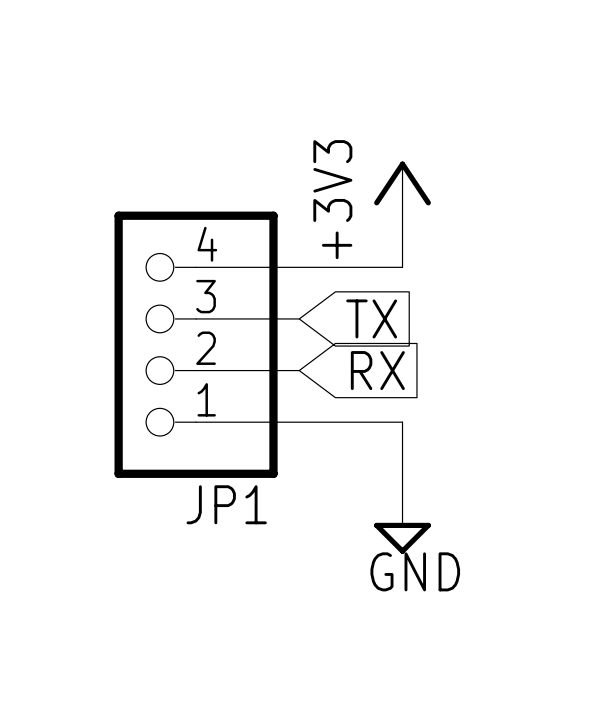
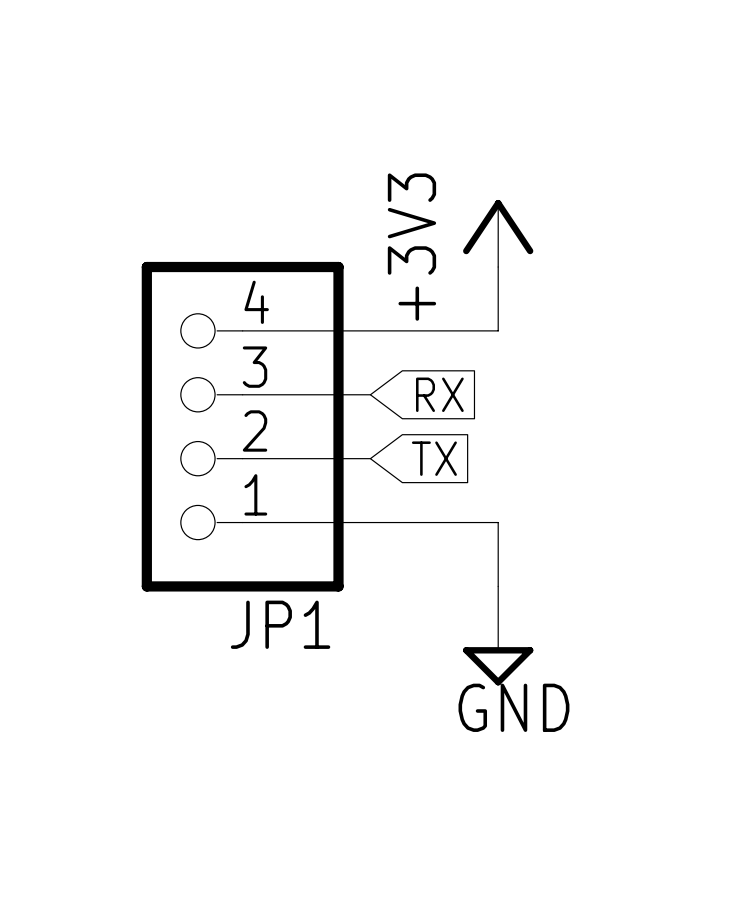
global label: TX (371, 318) -> RX (439, 394)
global label: RX (377, 370) -> TX (434, 458)

